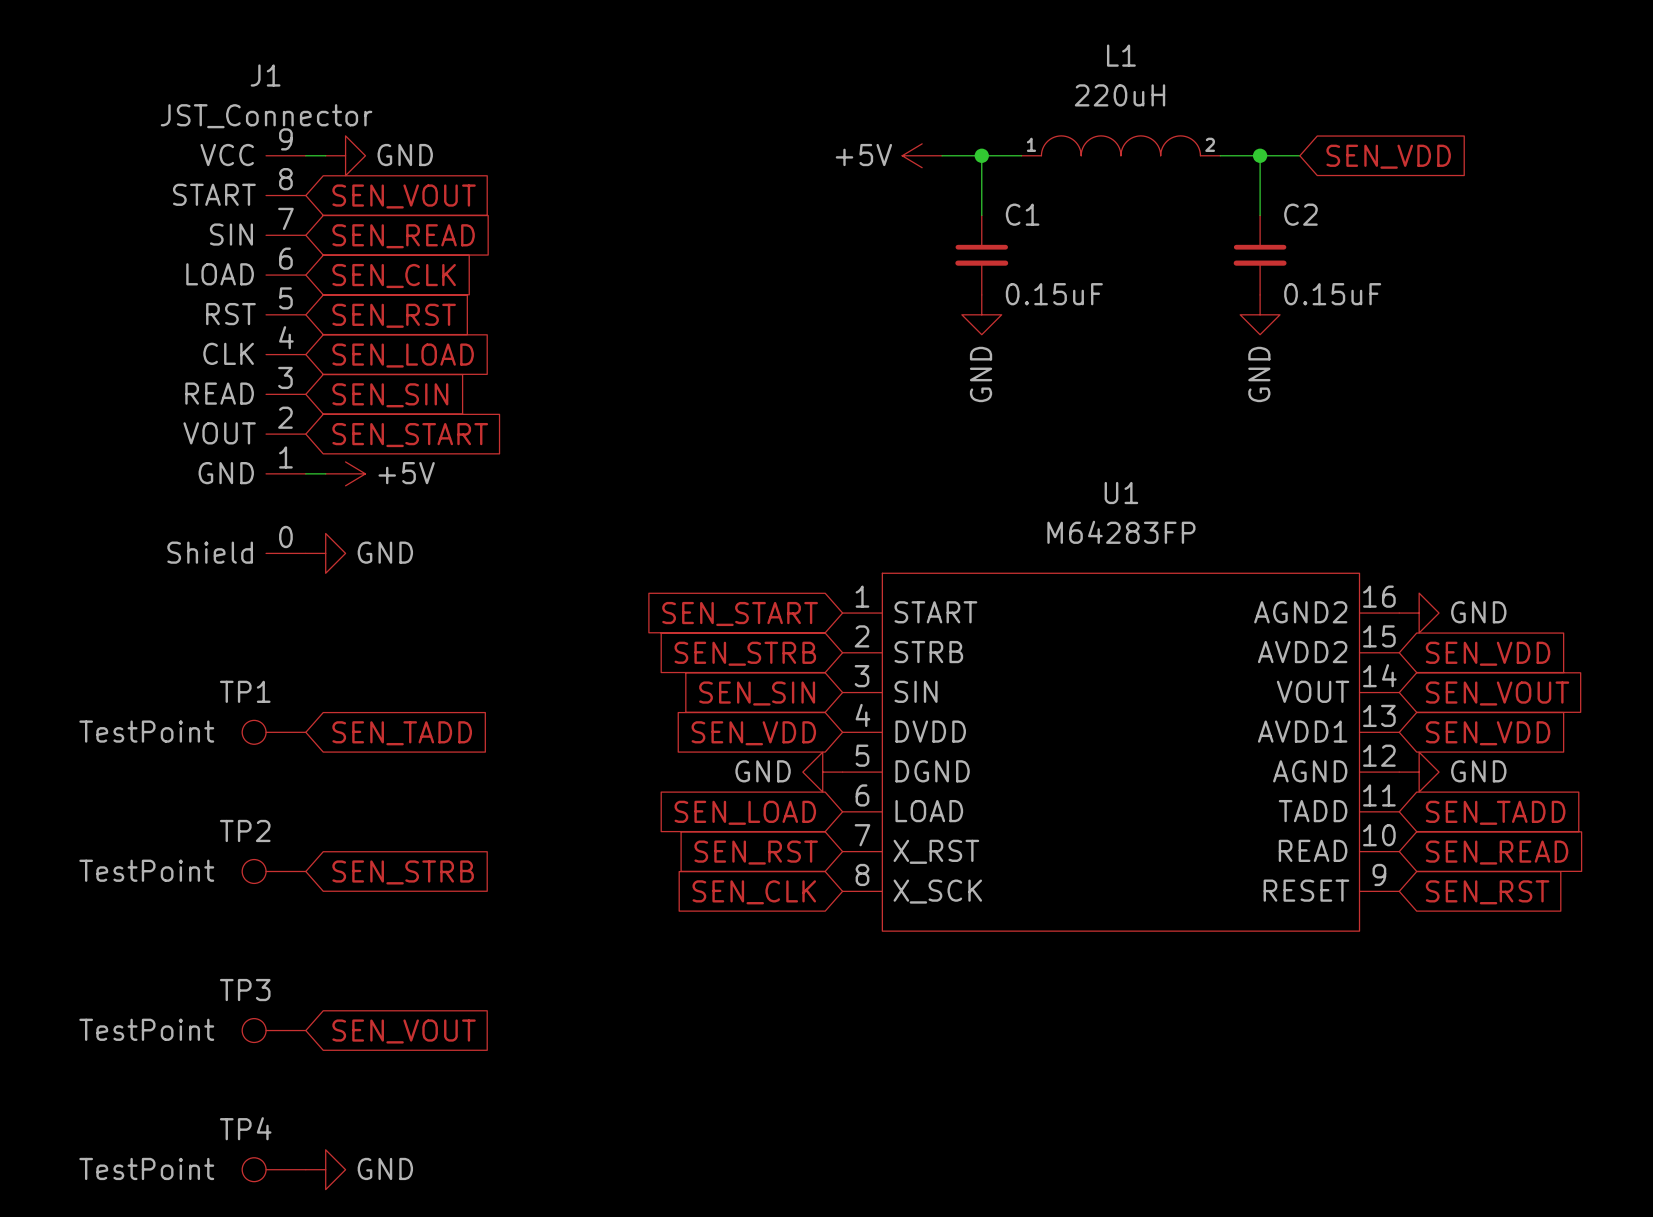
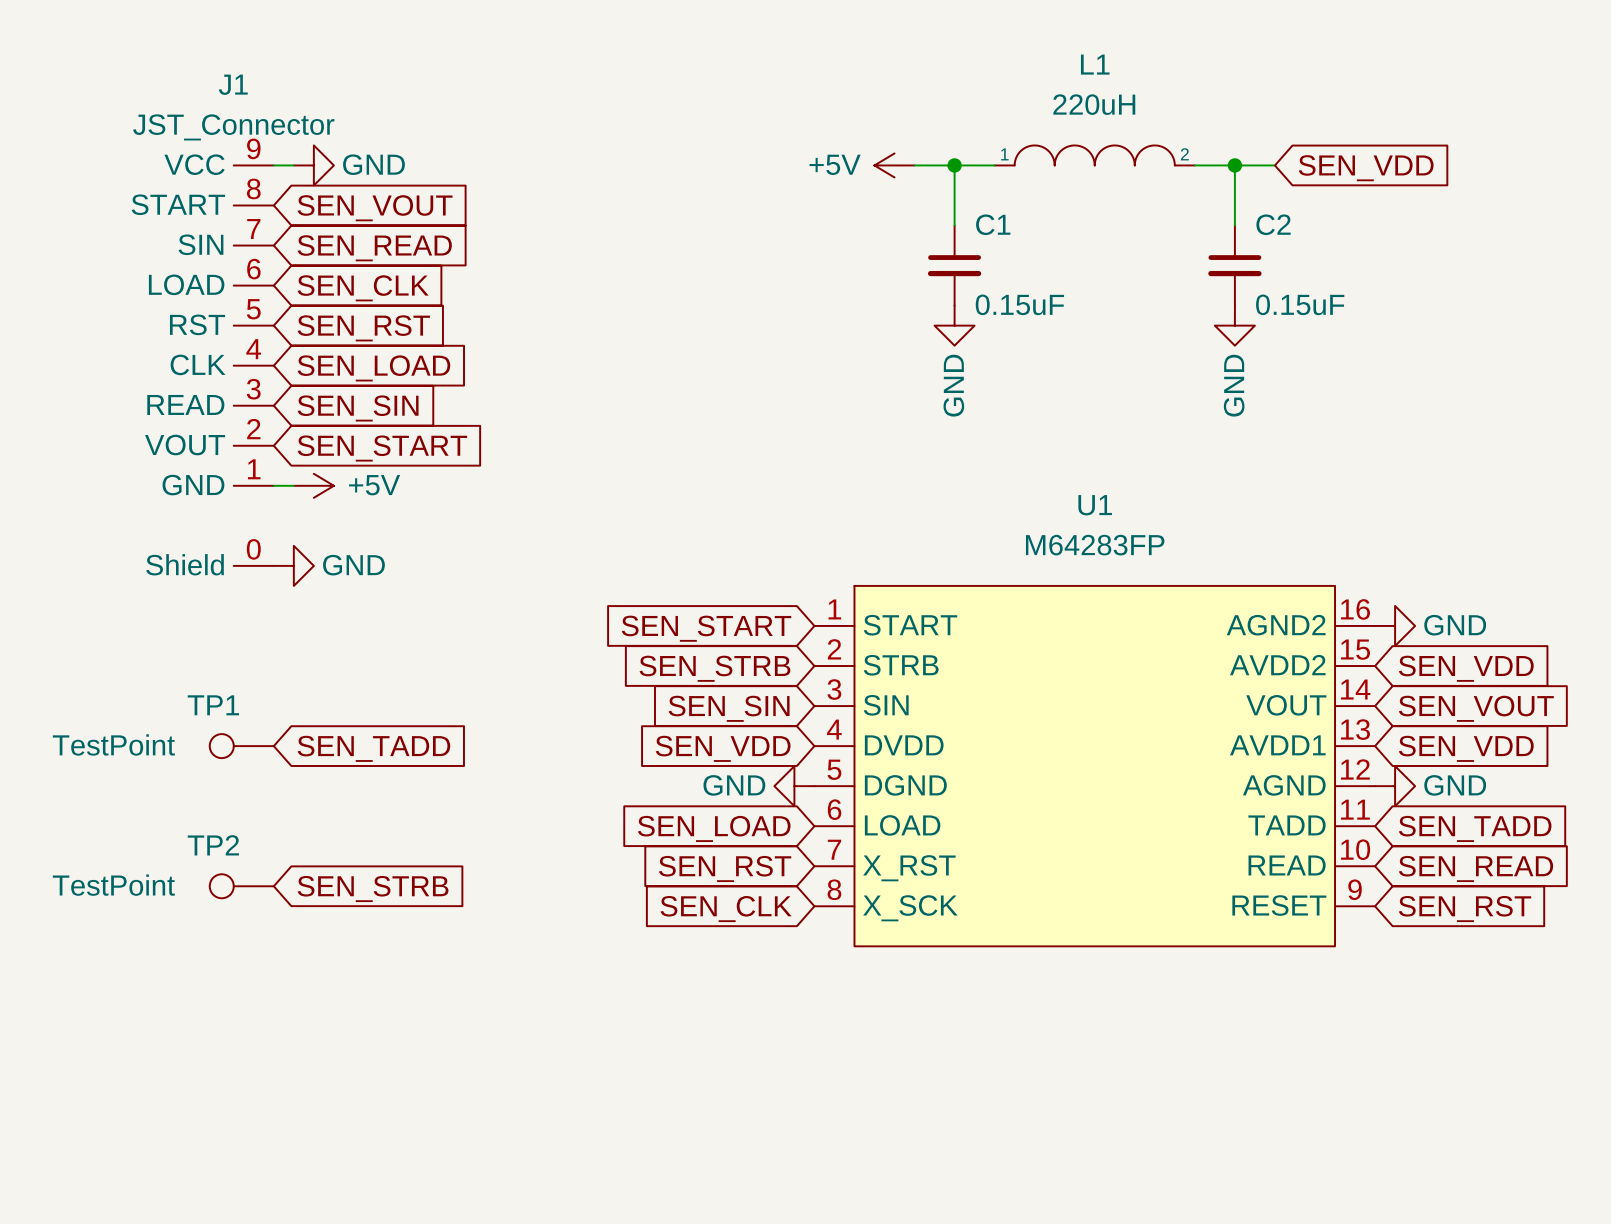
TP3: TestPoint (274, 1030) -> none
global label: SEN_VOUT (404, 1031) -> none
TP4: TestPoint (274, 1169) -> none
power symbol: GND (325, 1169) -> none

